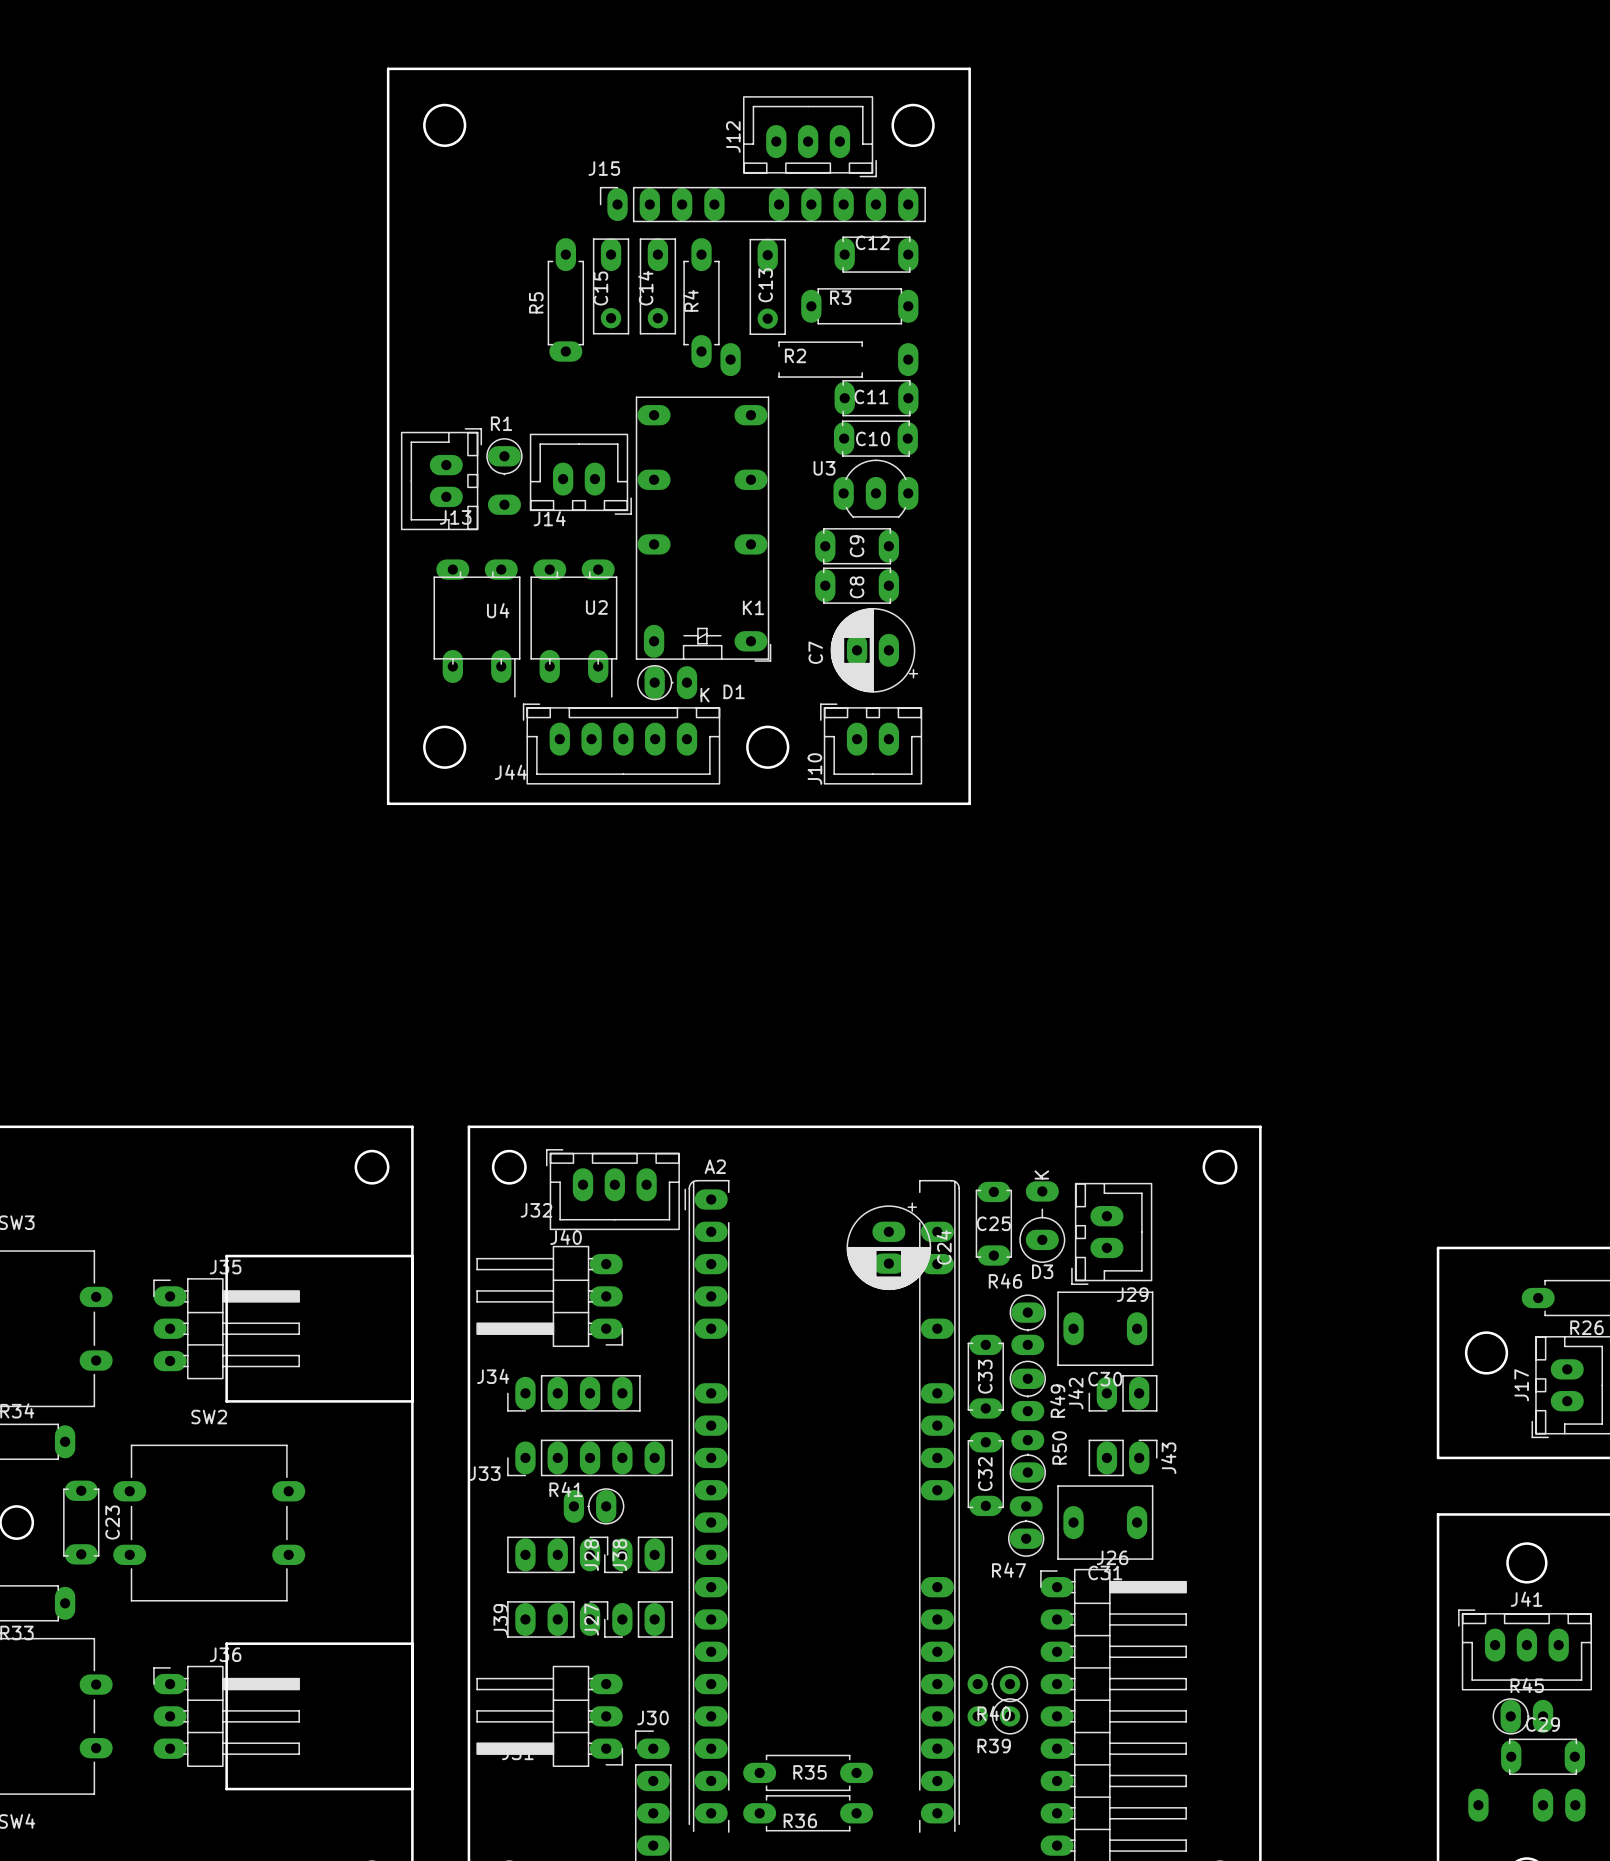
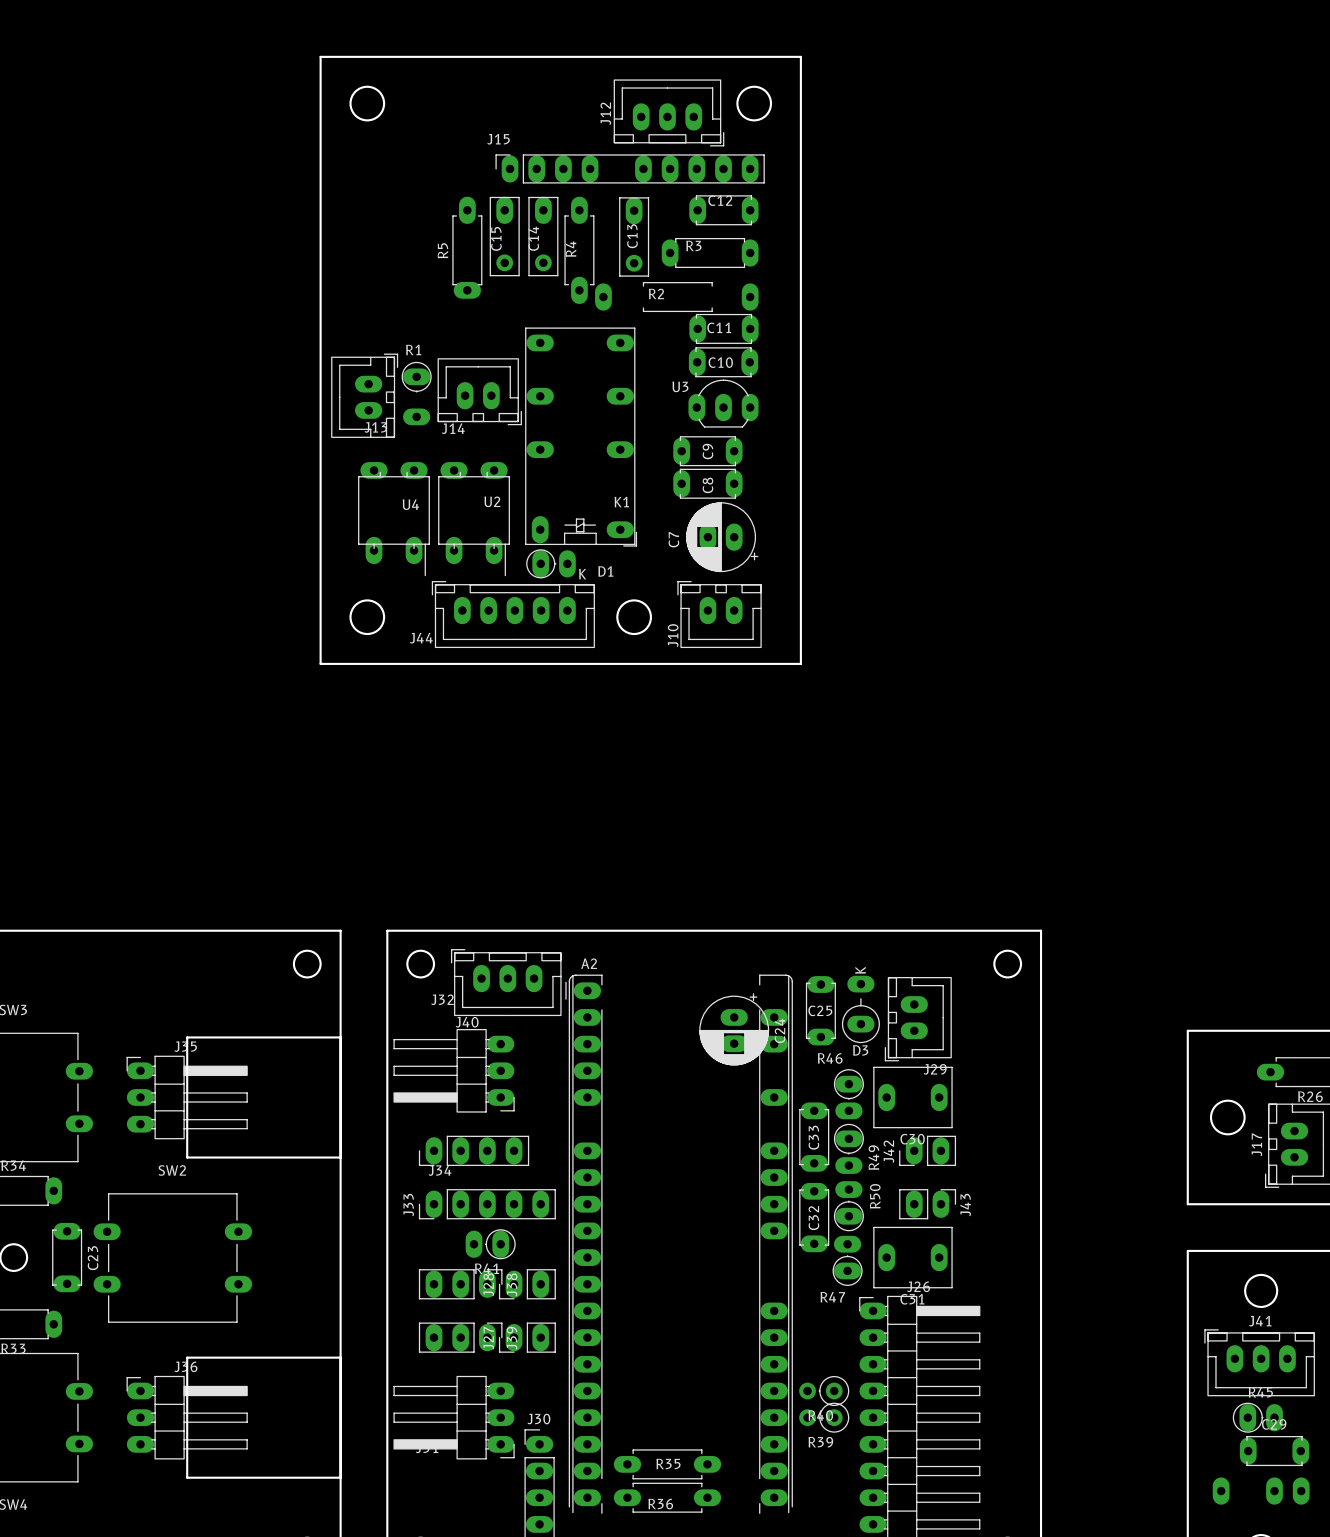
J34 name position: J34 (493, 1376) -> J34 (439, 1170)
J33 name rotation: 0° (484, 1473) -> 90° counterclockwise (408, 1205)
R41 name position: R41 (566, 1489) -> R41 (487, 1268)
J39 name position: J39 (500, 1619) -> J39 (512, 1338)

